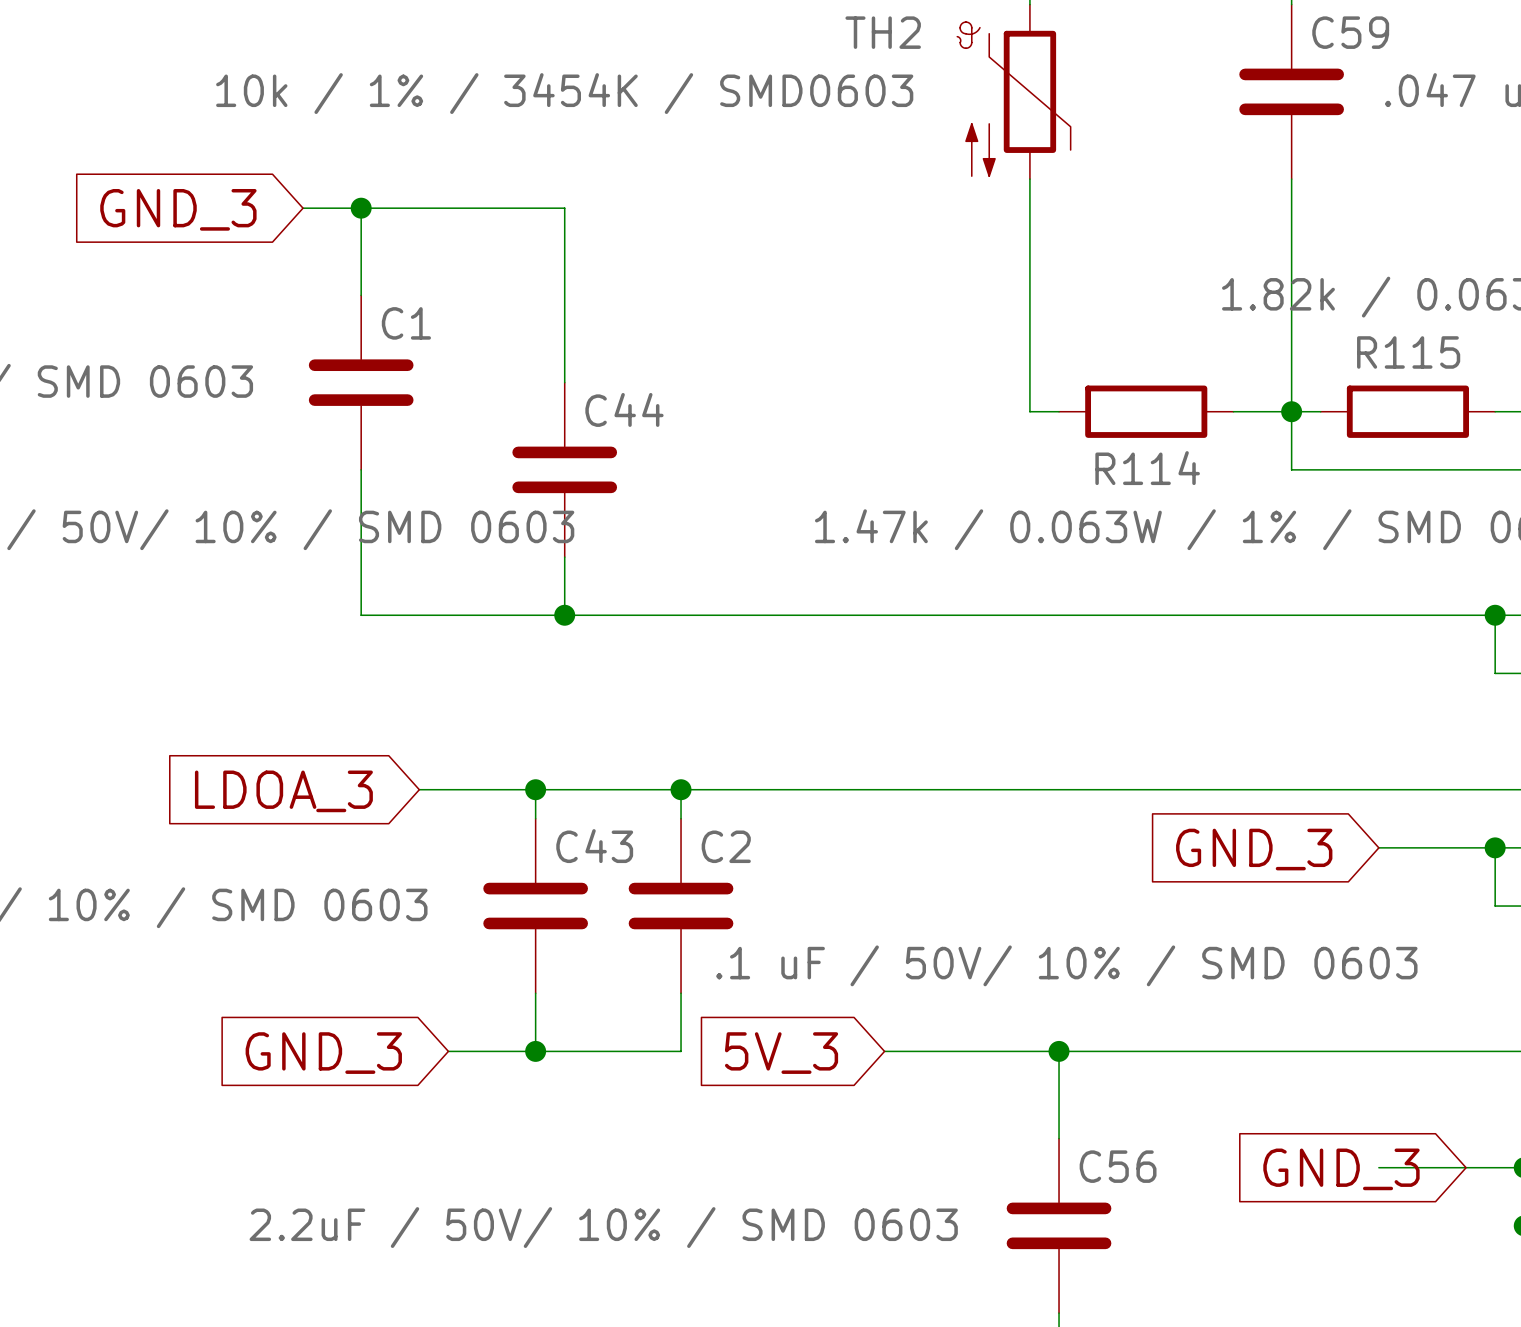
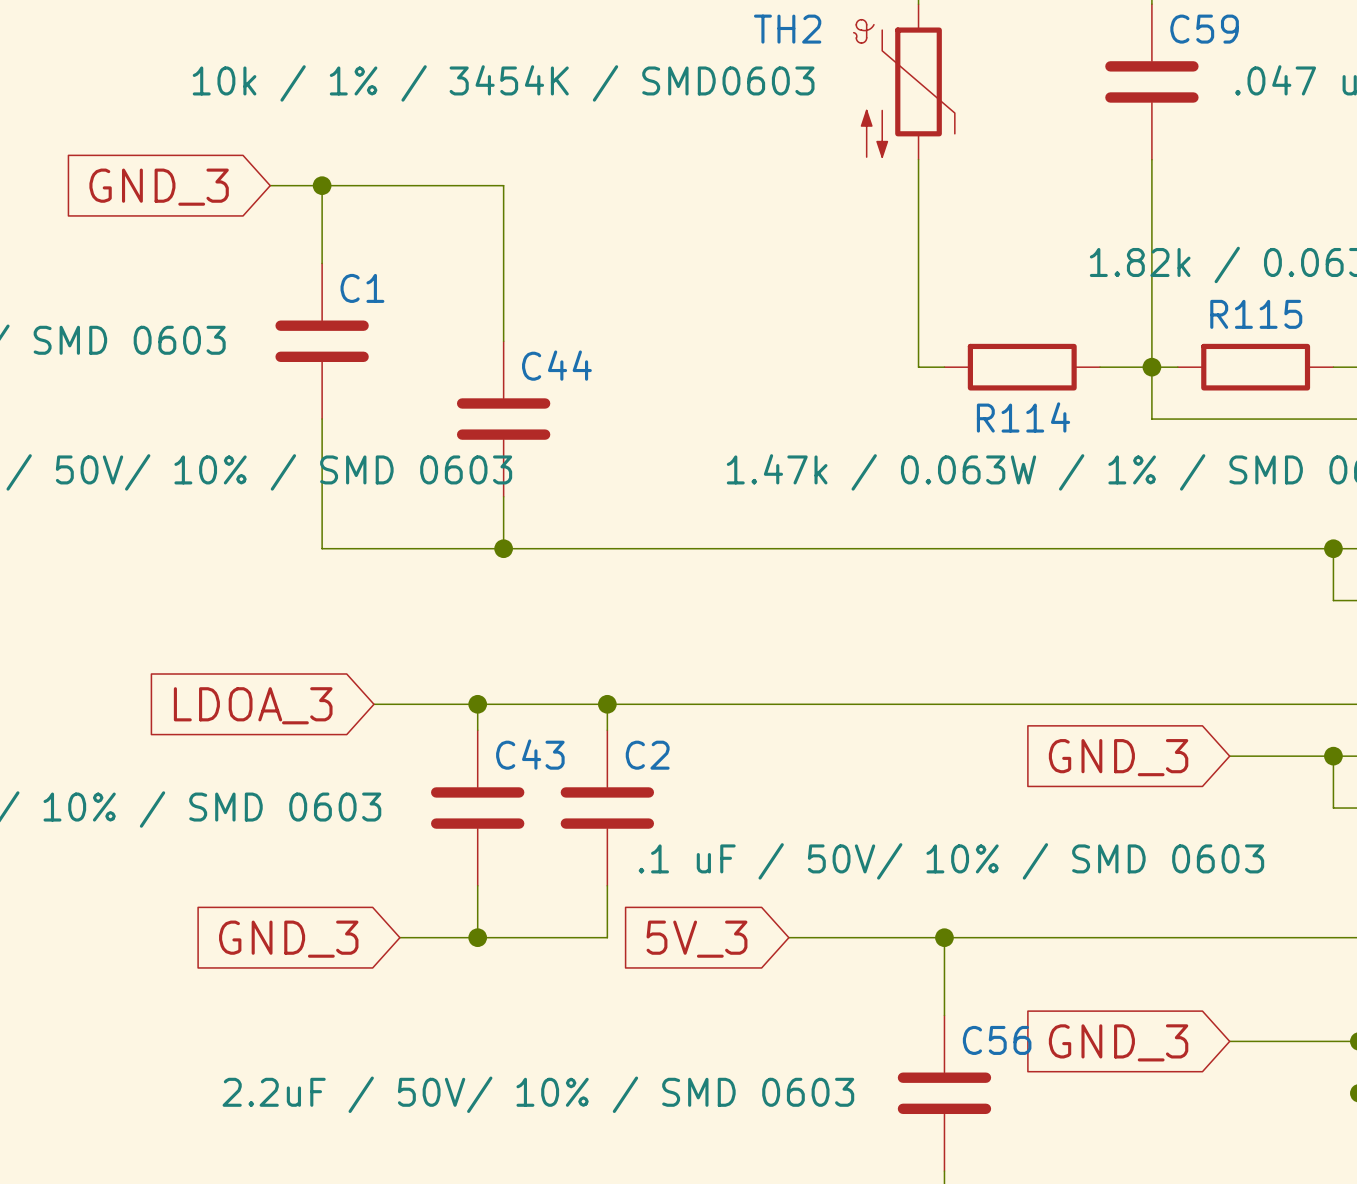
global label position: GND_3 (1341, 1169) -> GND_3 (1118, 1042)

